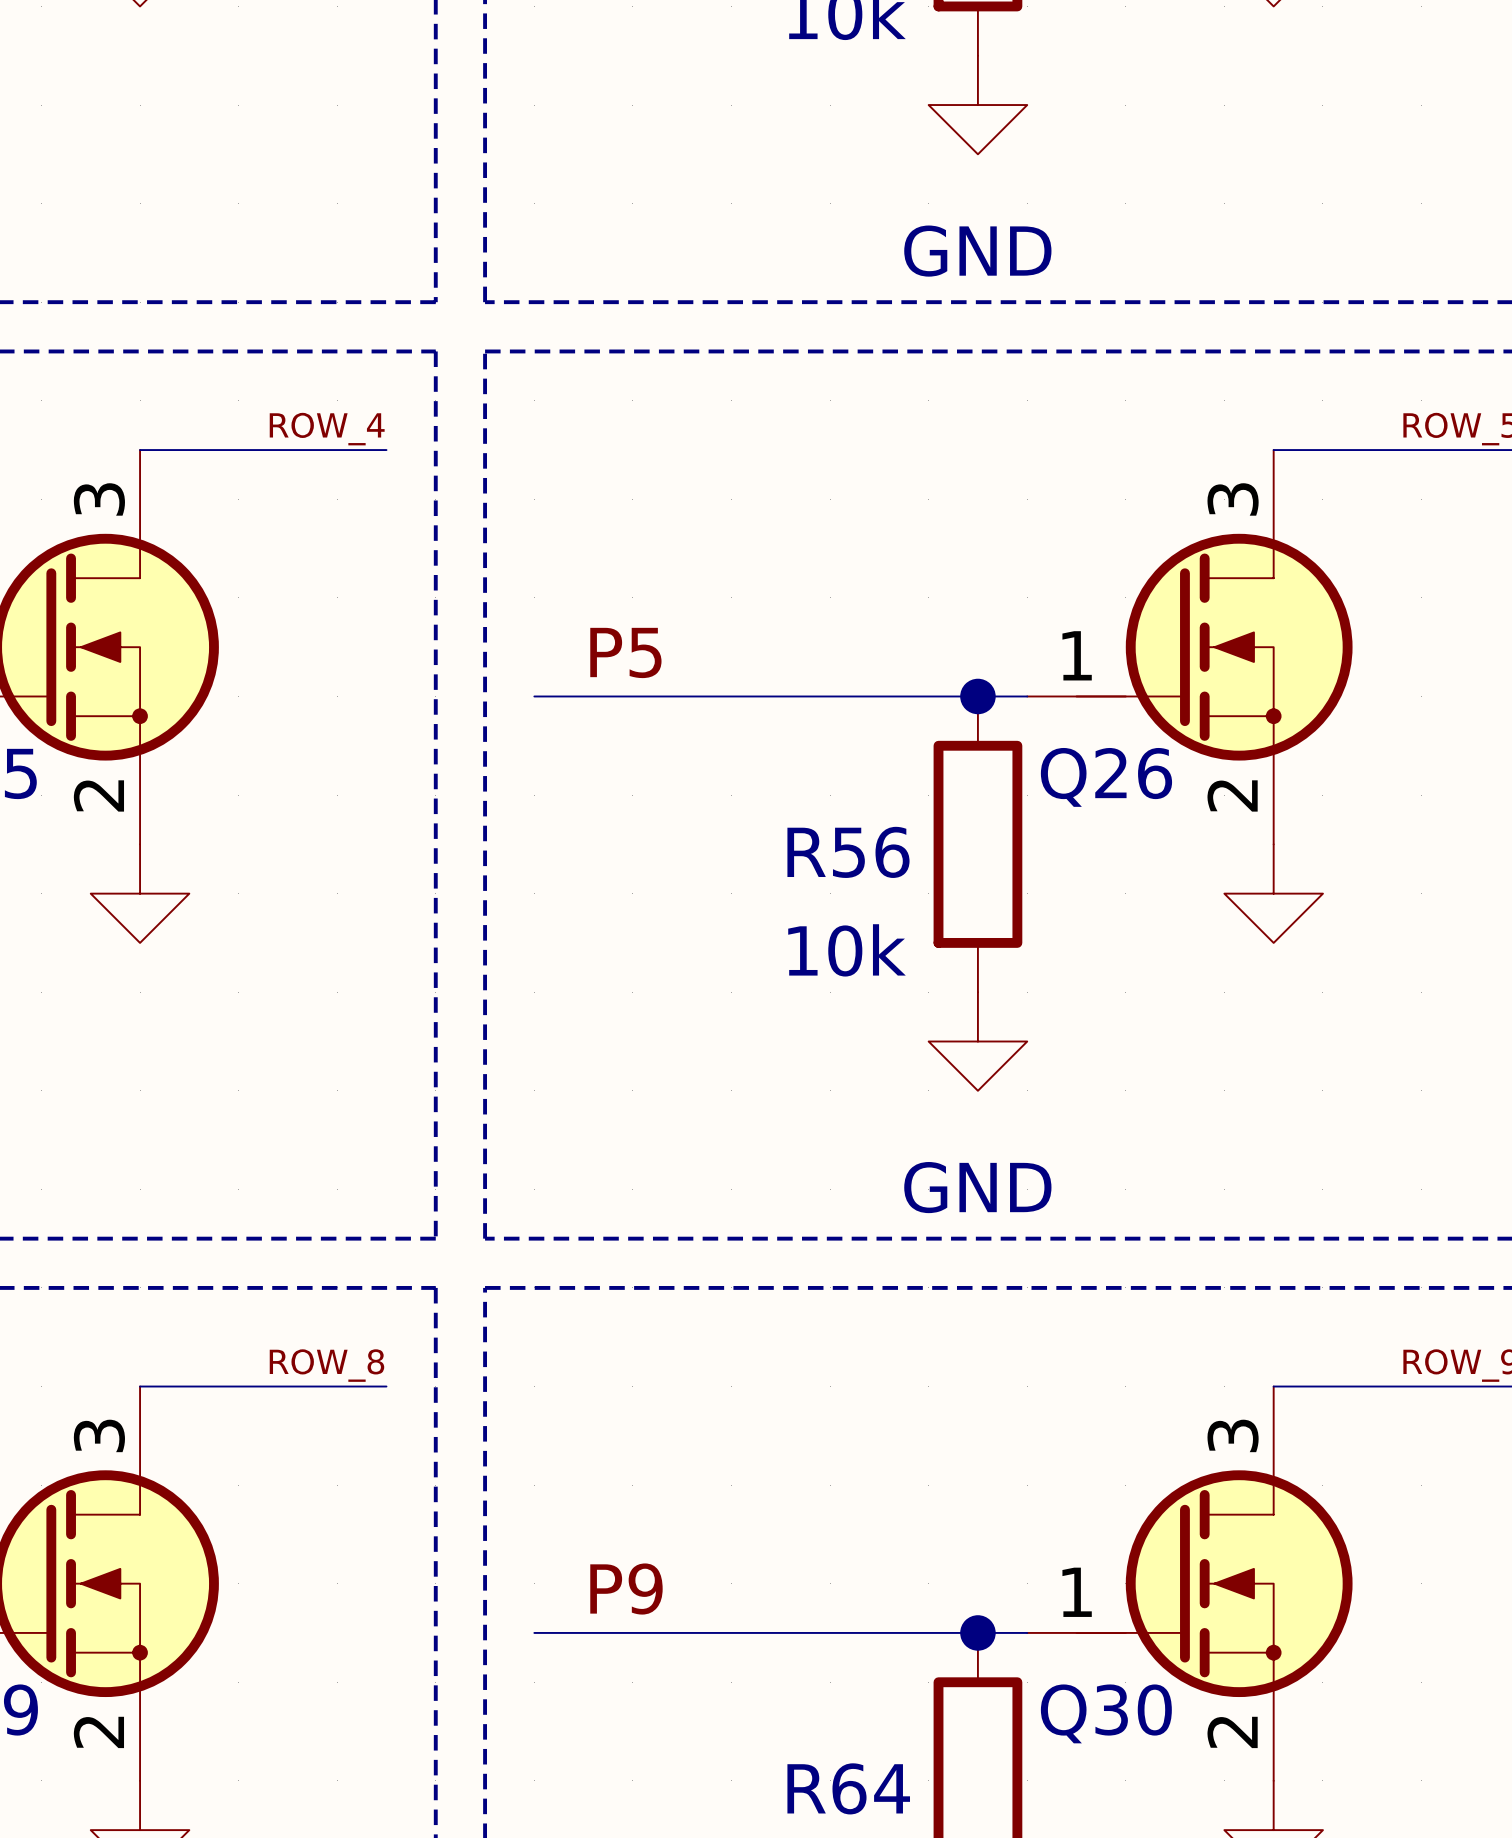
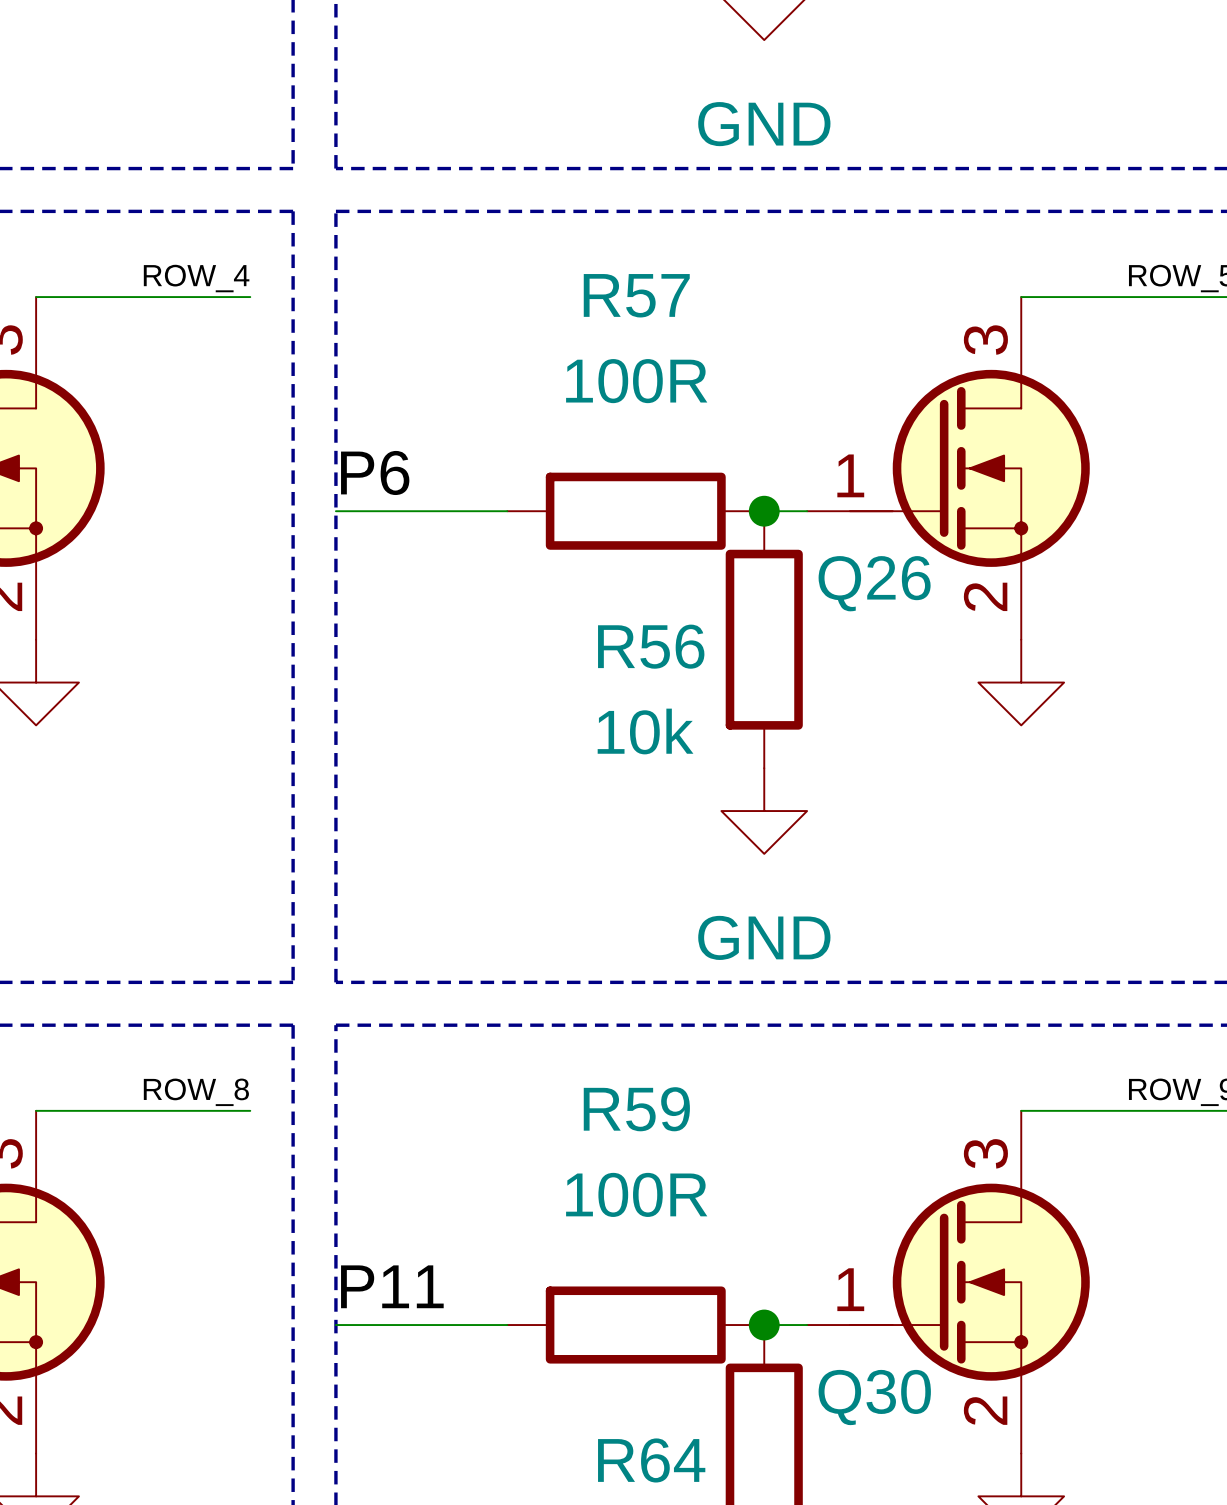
label: none -> P6 (375, 472)
label: P5 (625, 652) -> none
wire: none -> (335, 511) (378, 511)
wire: (682, 696) (977, 696) -> none
R57: none -> 100R (635, 511)
label: none -> P11 (392, 1286)
label: P9 (626, 1589) -> none
wire: none -> (335, 1325) (378, 1325)
wire: (682, 1632) (977, 1632) -> none
R59: none -> 100R (635, 1325)

